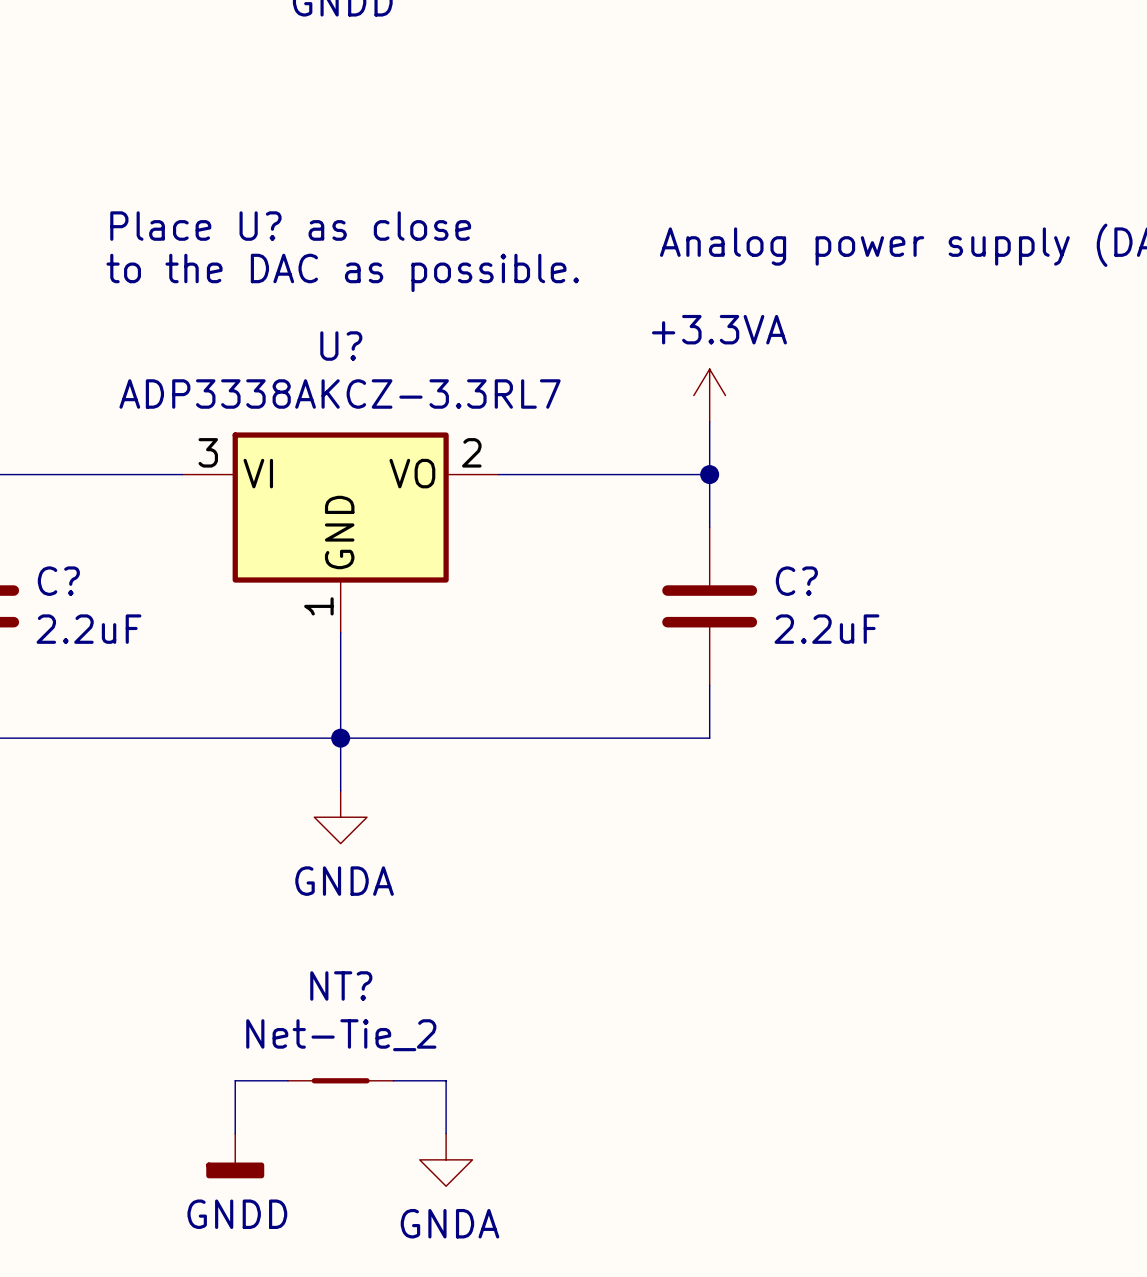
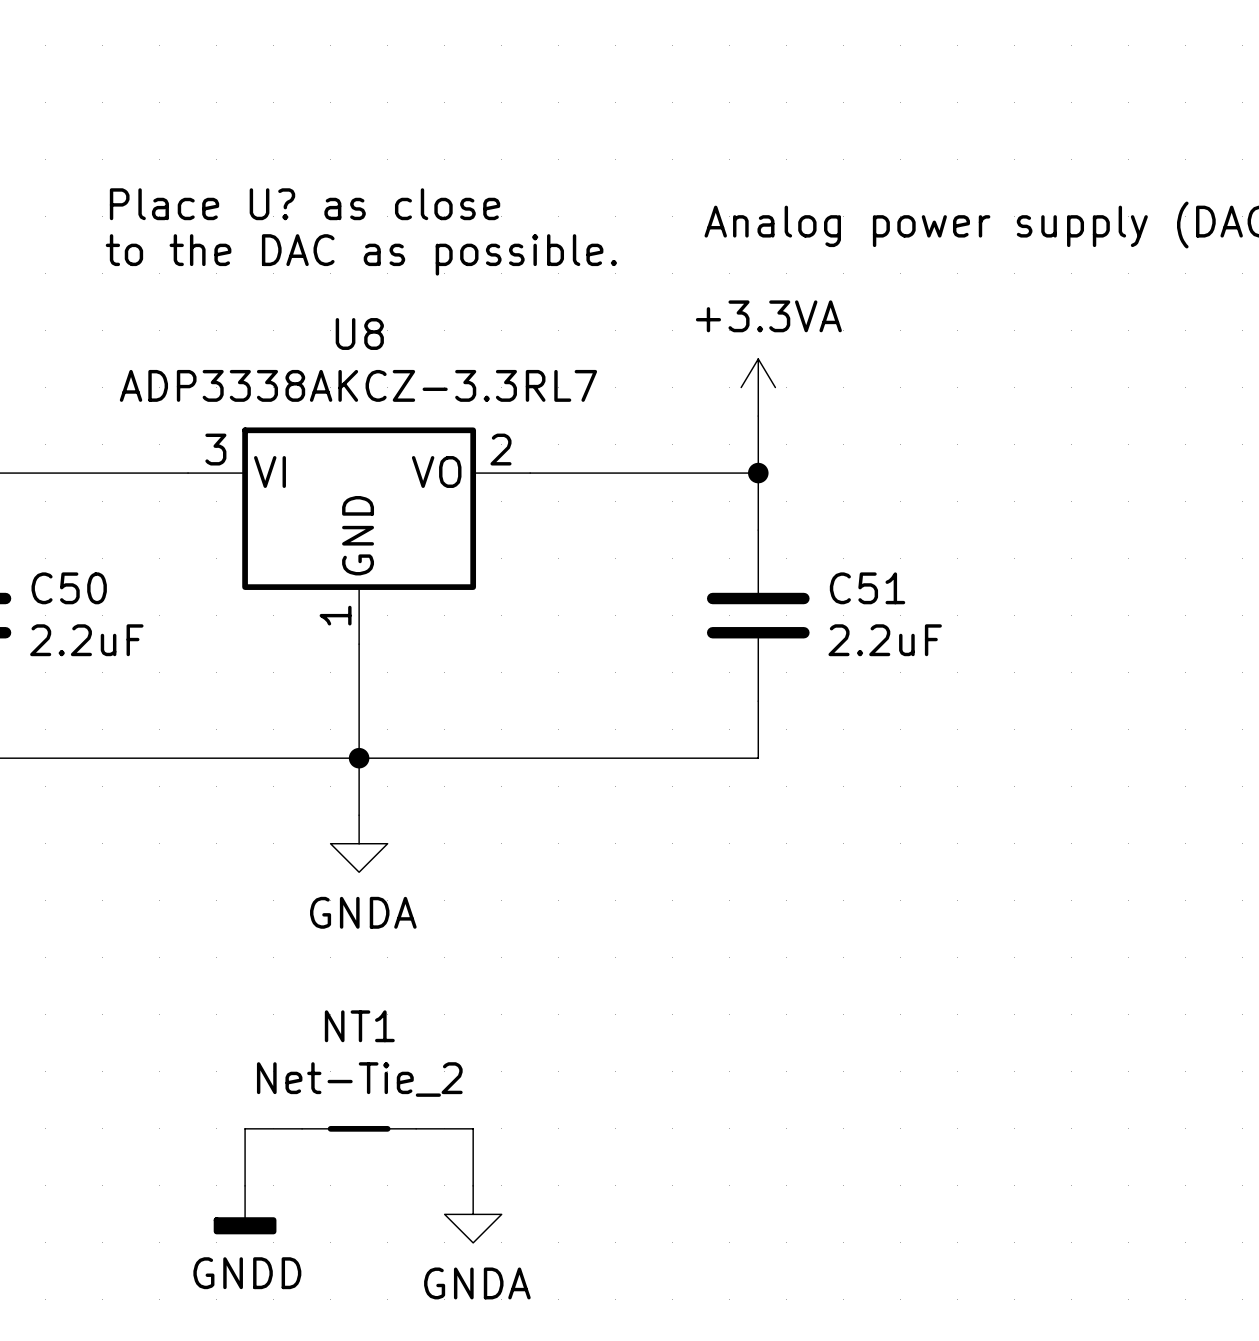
U? name: U? (341, 346) -> U8 (359, 334)
C? name: C? (58, 581) -> C50 (69, 588)
C? name: C? (796, 581) -> C51 (867, 588)
NT? name: NT? (341, 985) -> NT1 (359, 1026)

